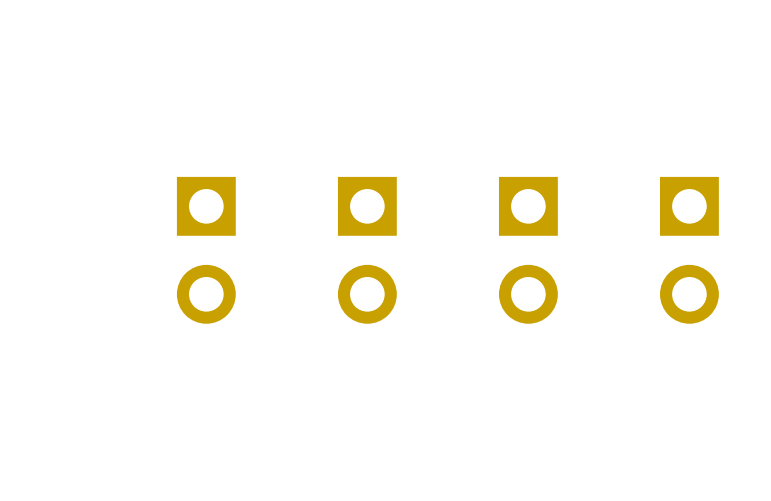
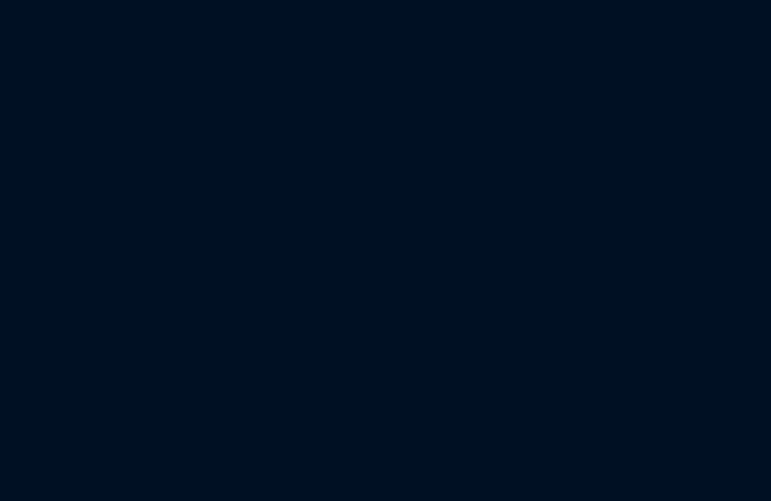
part: (206, 250) -> none
part: (367, 250) -> none
part: (528, 250) -> none
part: (689, 250) -> none

